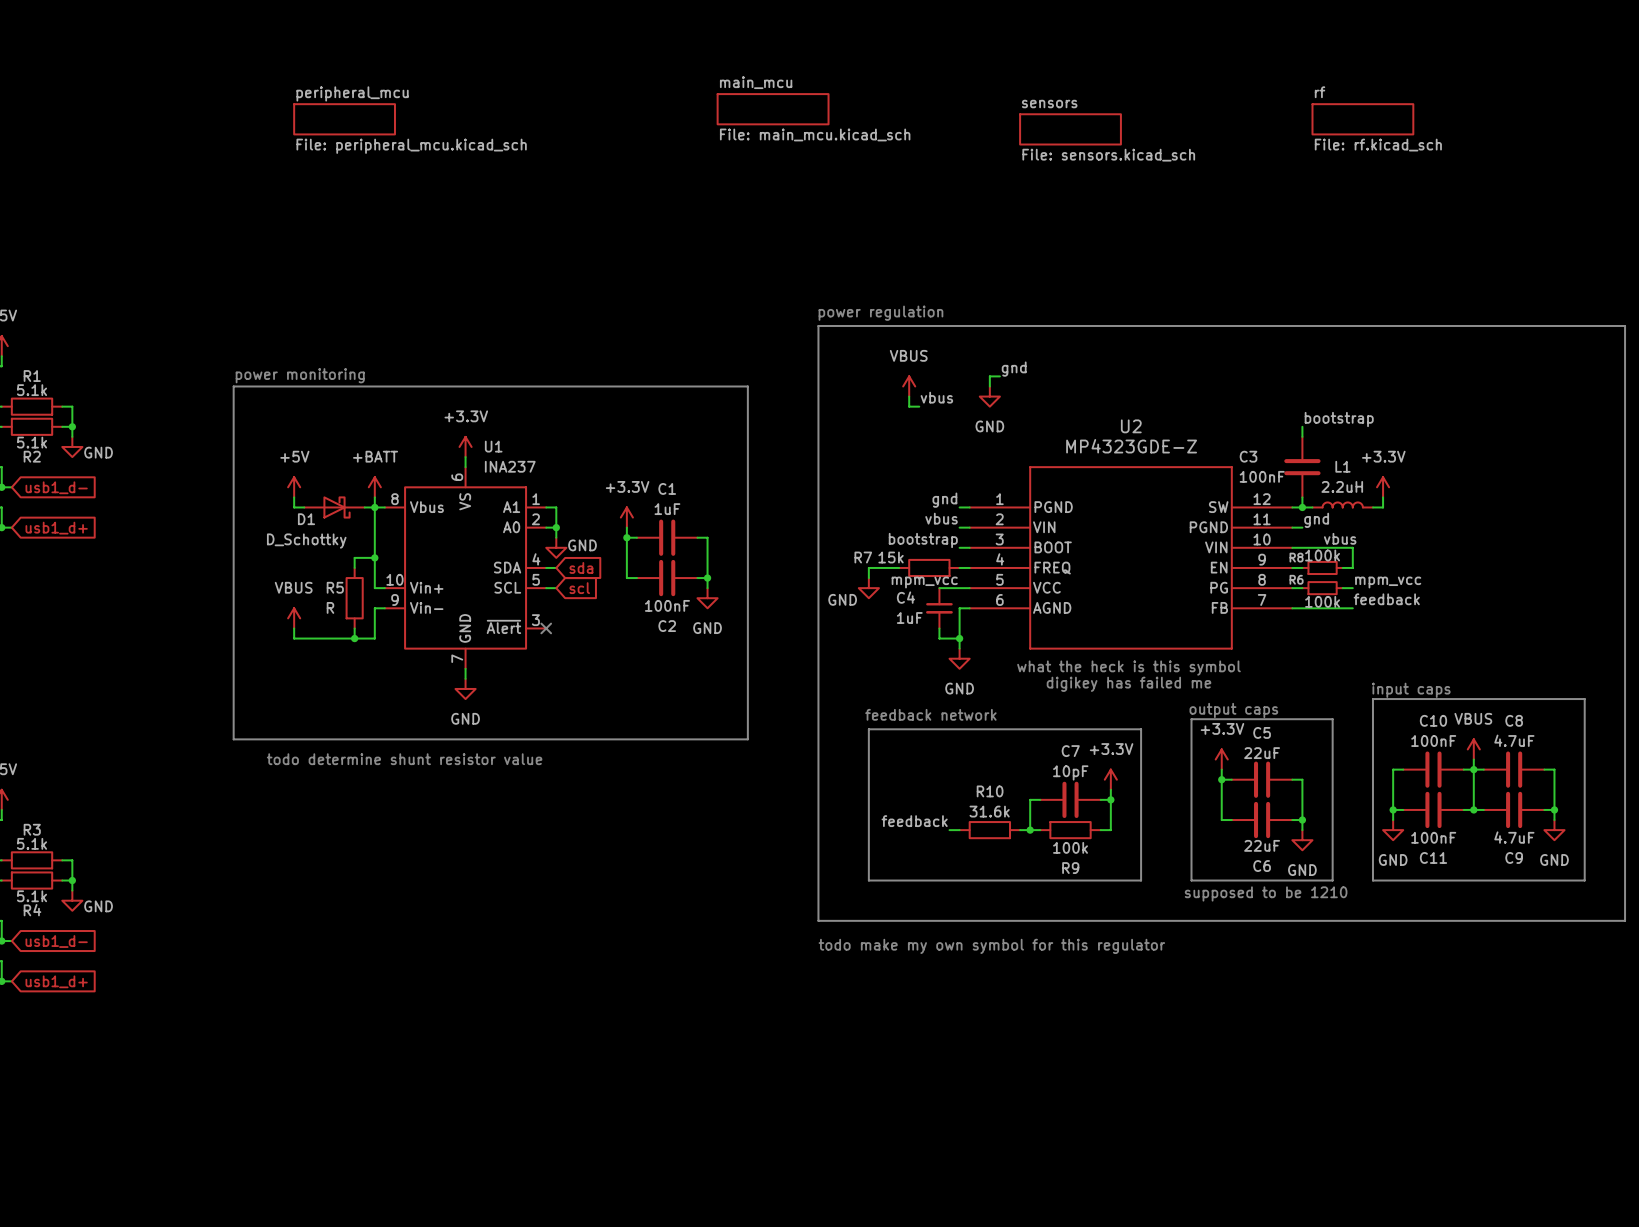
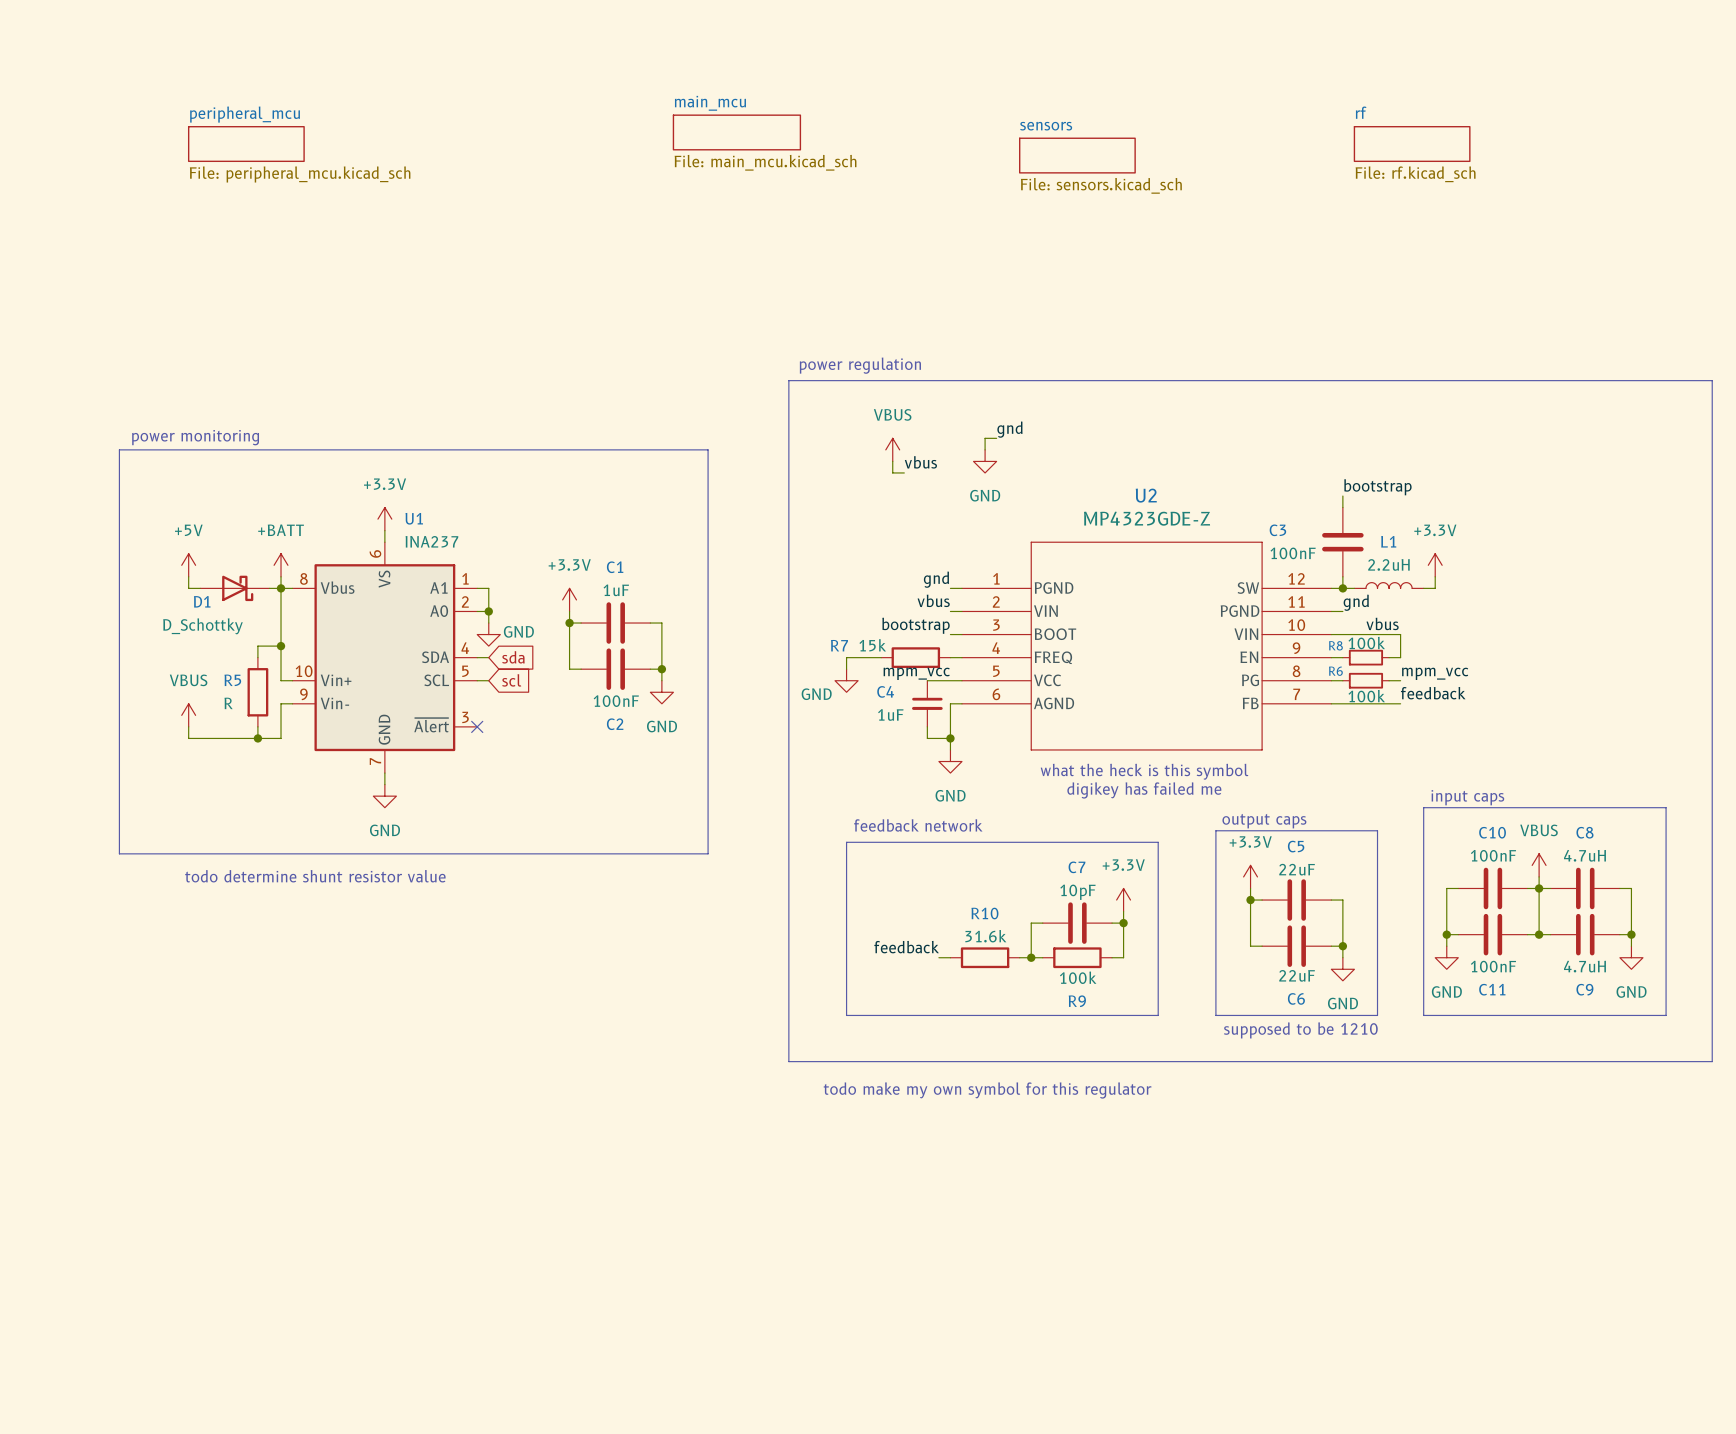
C8 value: 4.7uF (1514, 740) -> 4.7uH (1584, 855)
C9 value: 4.7uF (1514, 837) -> 4.7uH (1584, 966)

